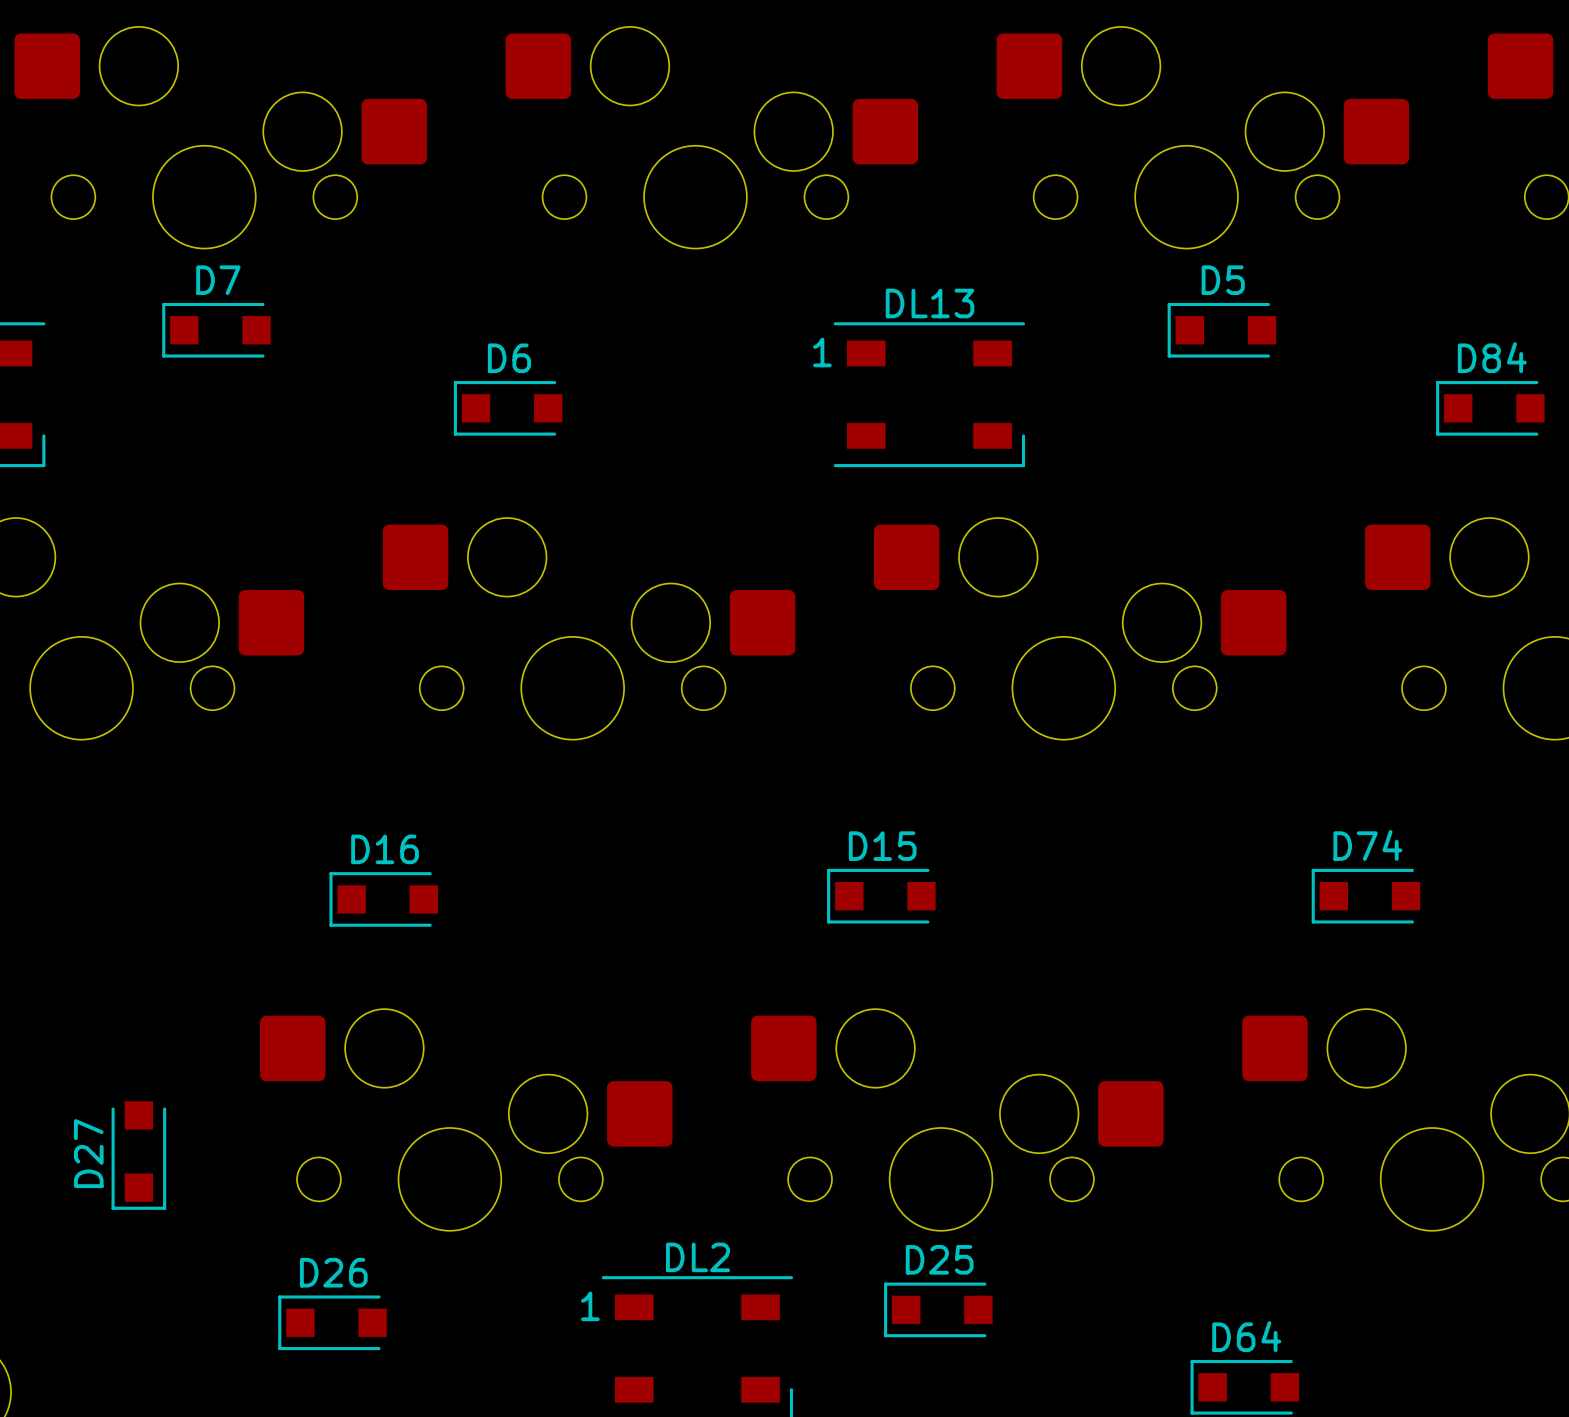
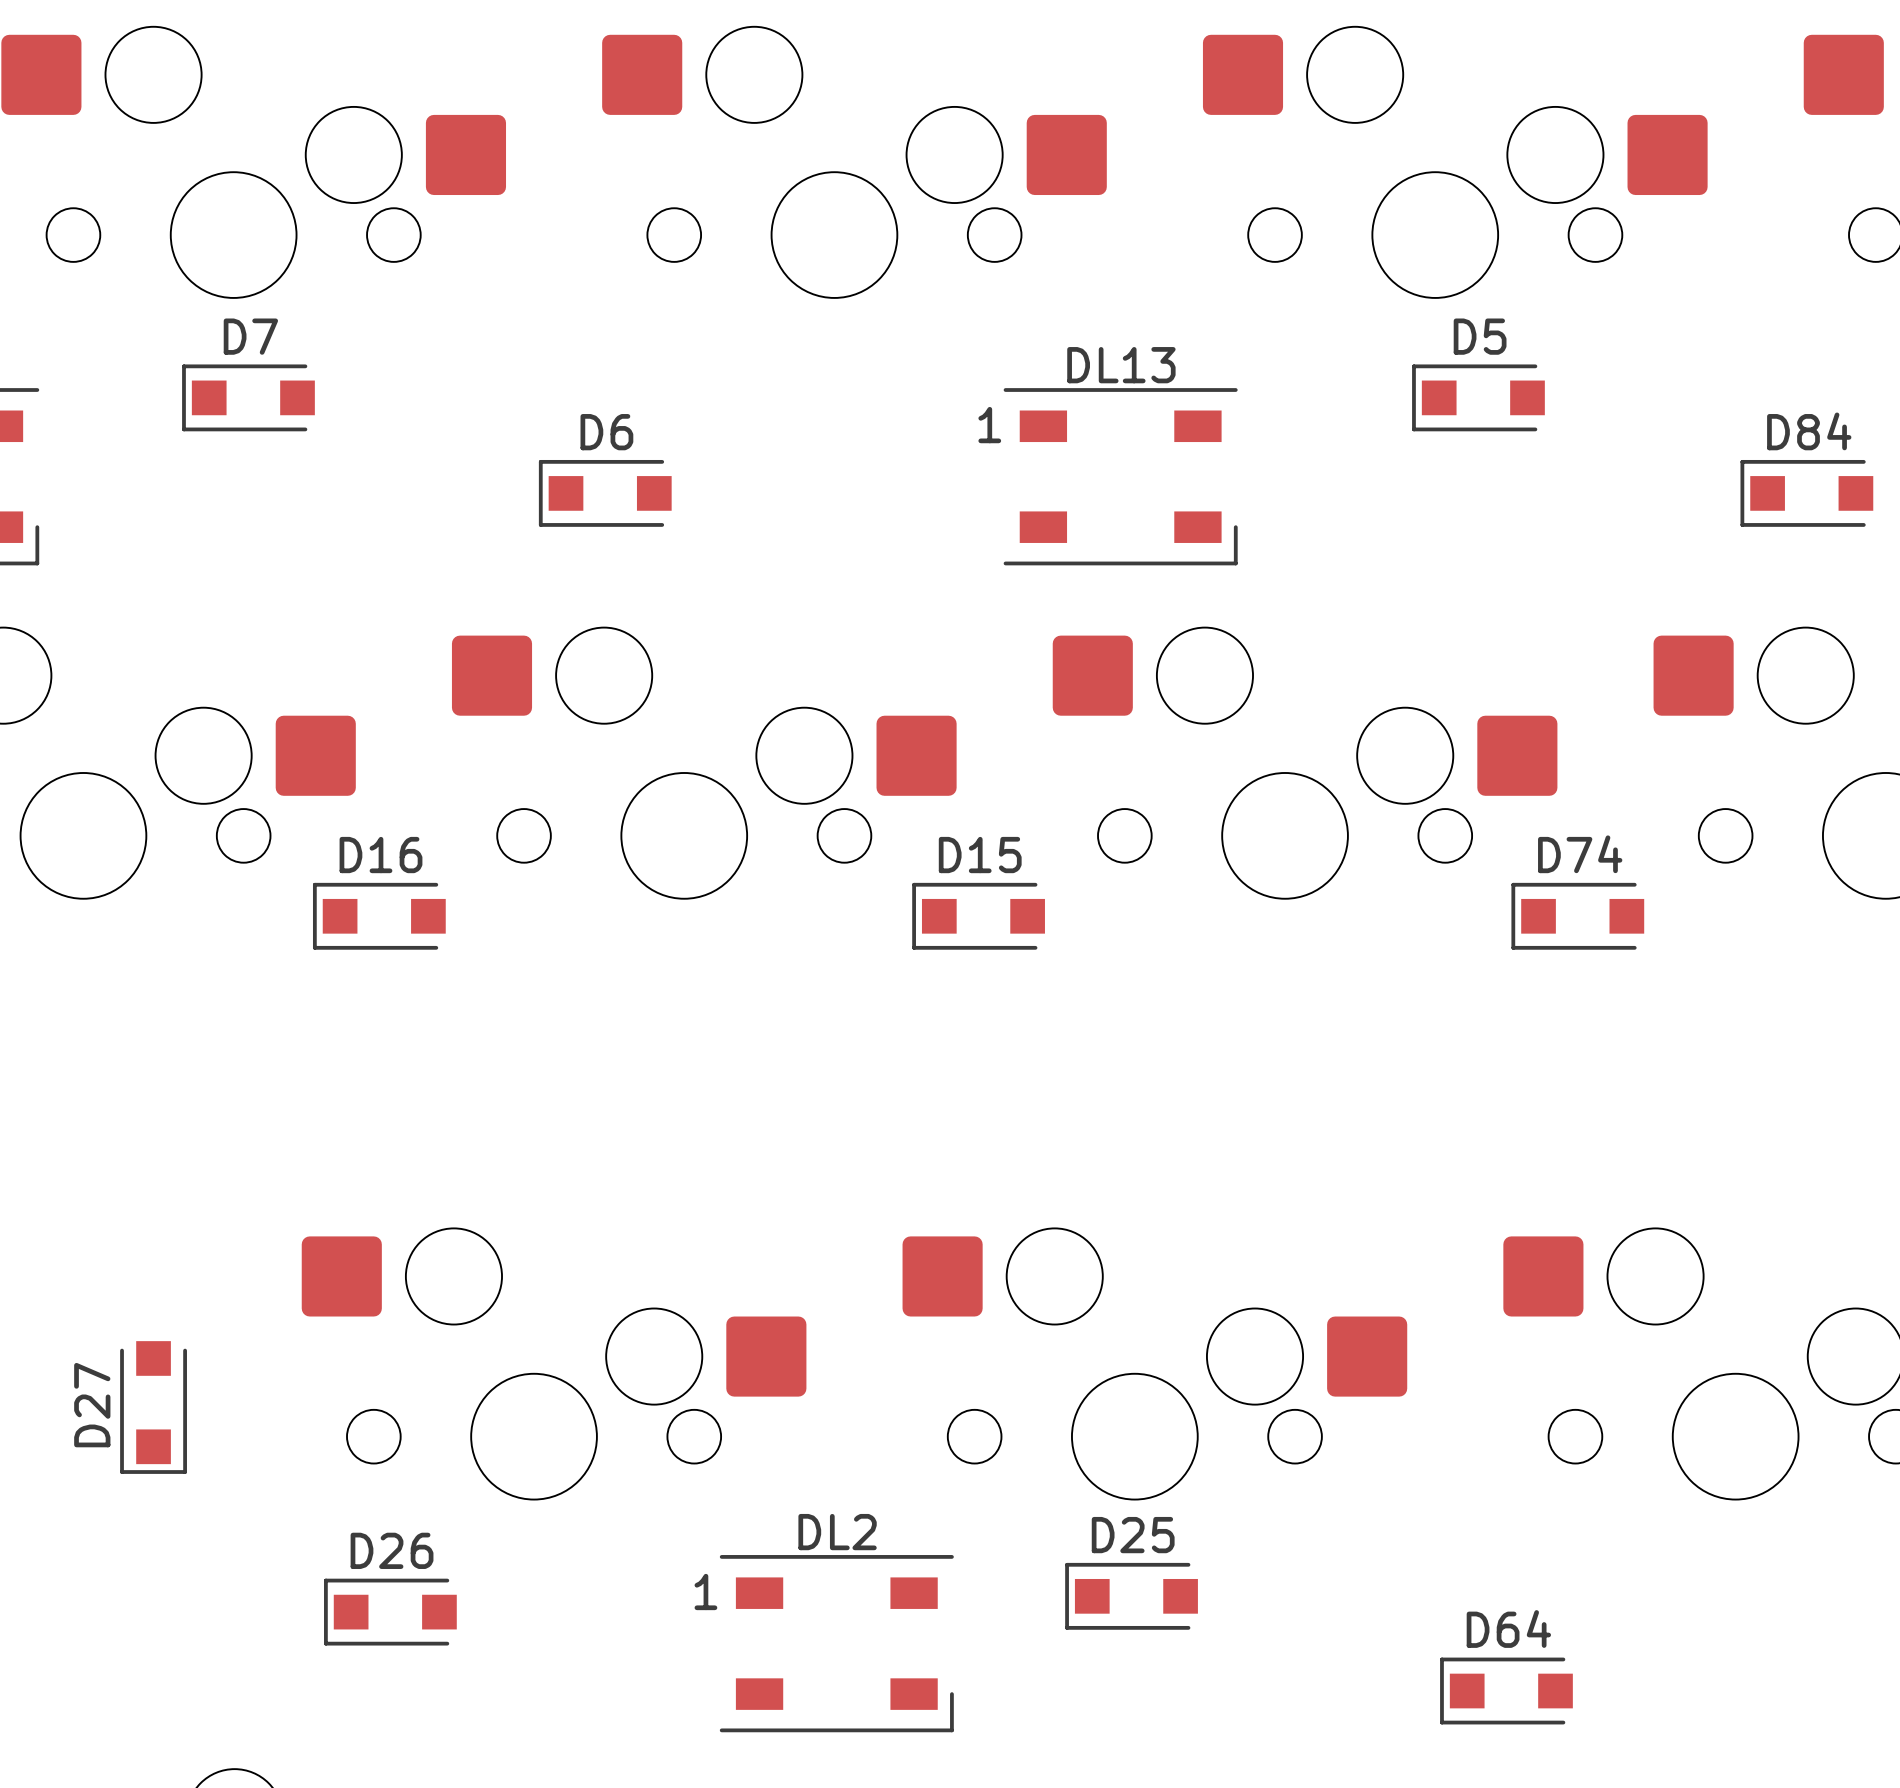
D15 position: (881, 896) -> (978, 916)
D74 position: (1365, 896) -> (1577, 916)
D16 position: (383, 899) -> (379, 916)

